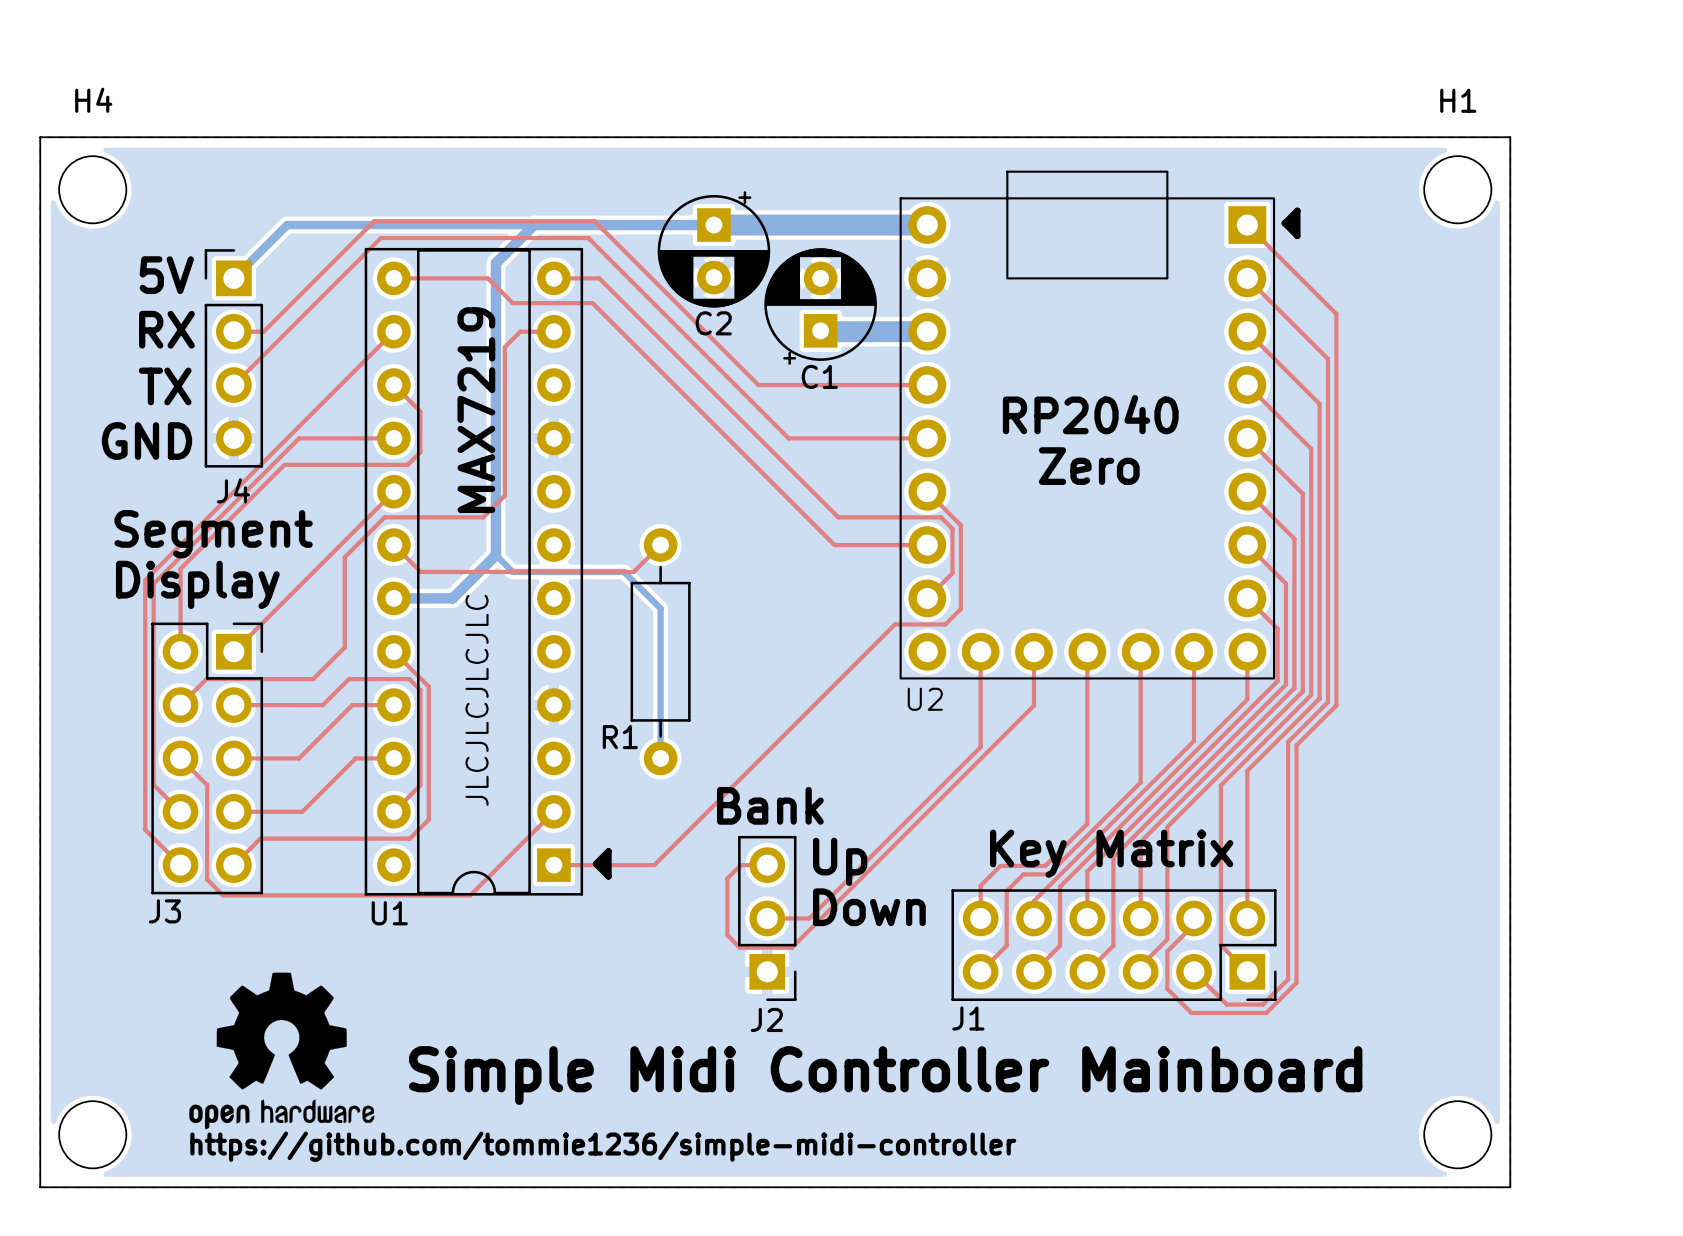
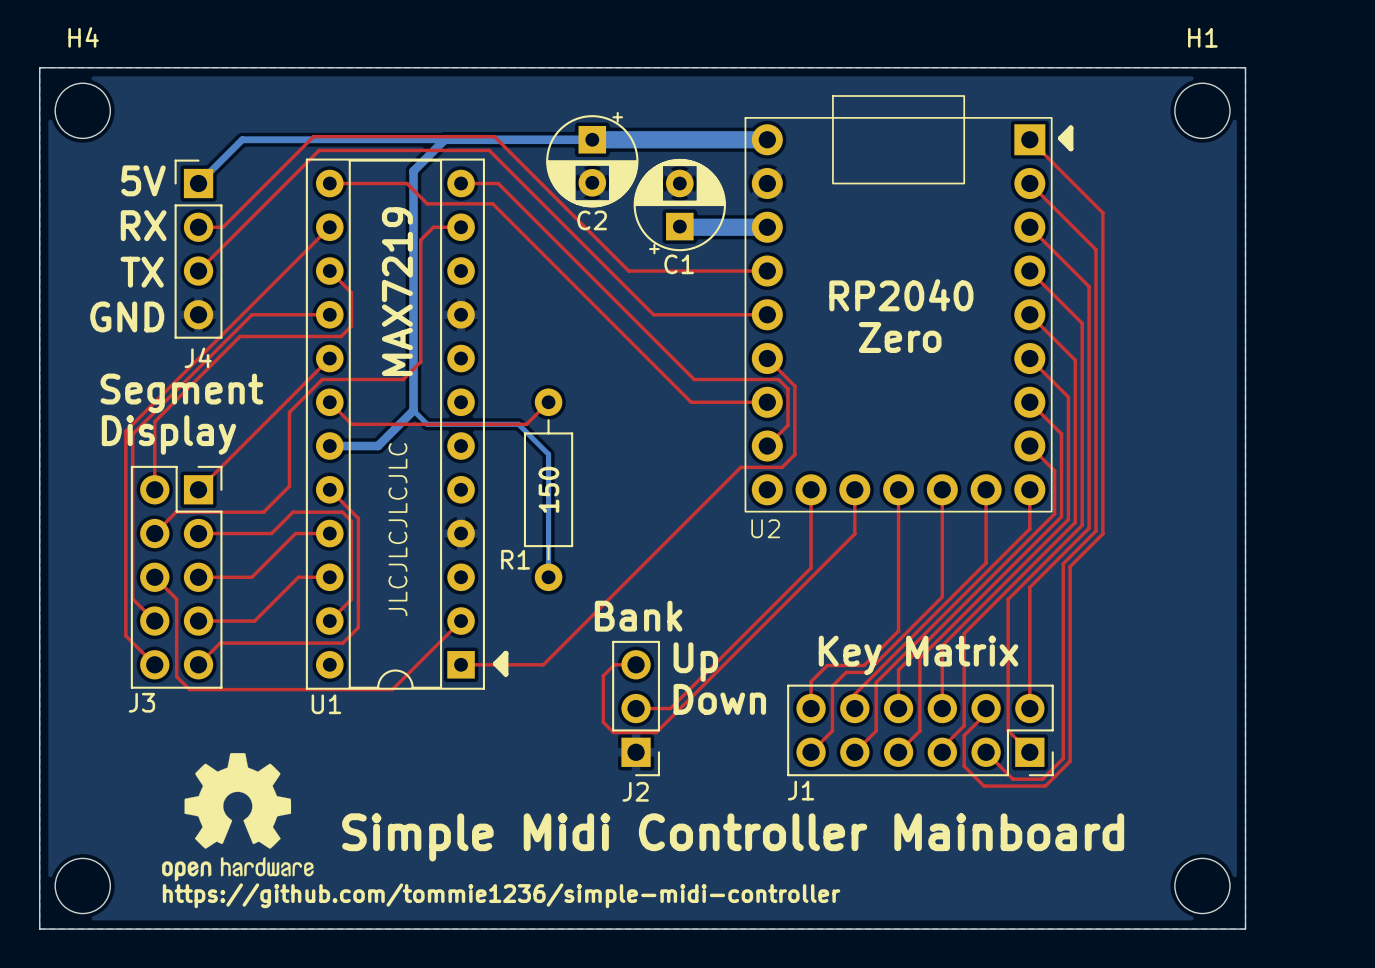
R1 value: none -> 150 (548, 489)

